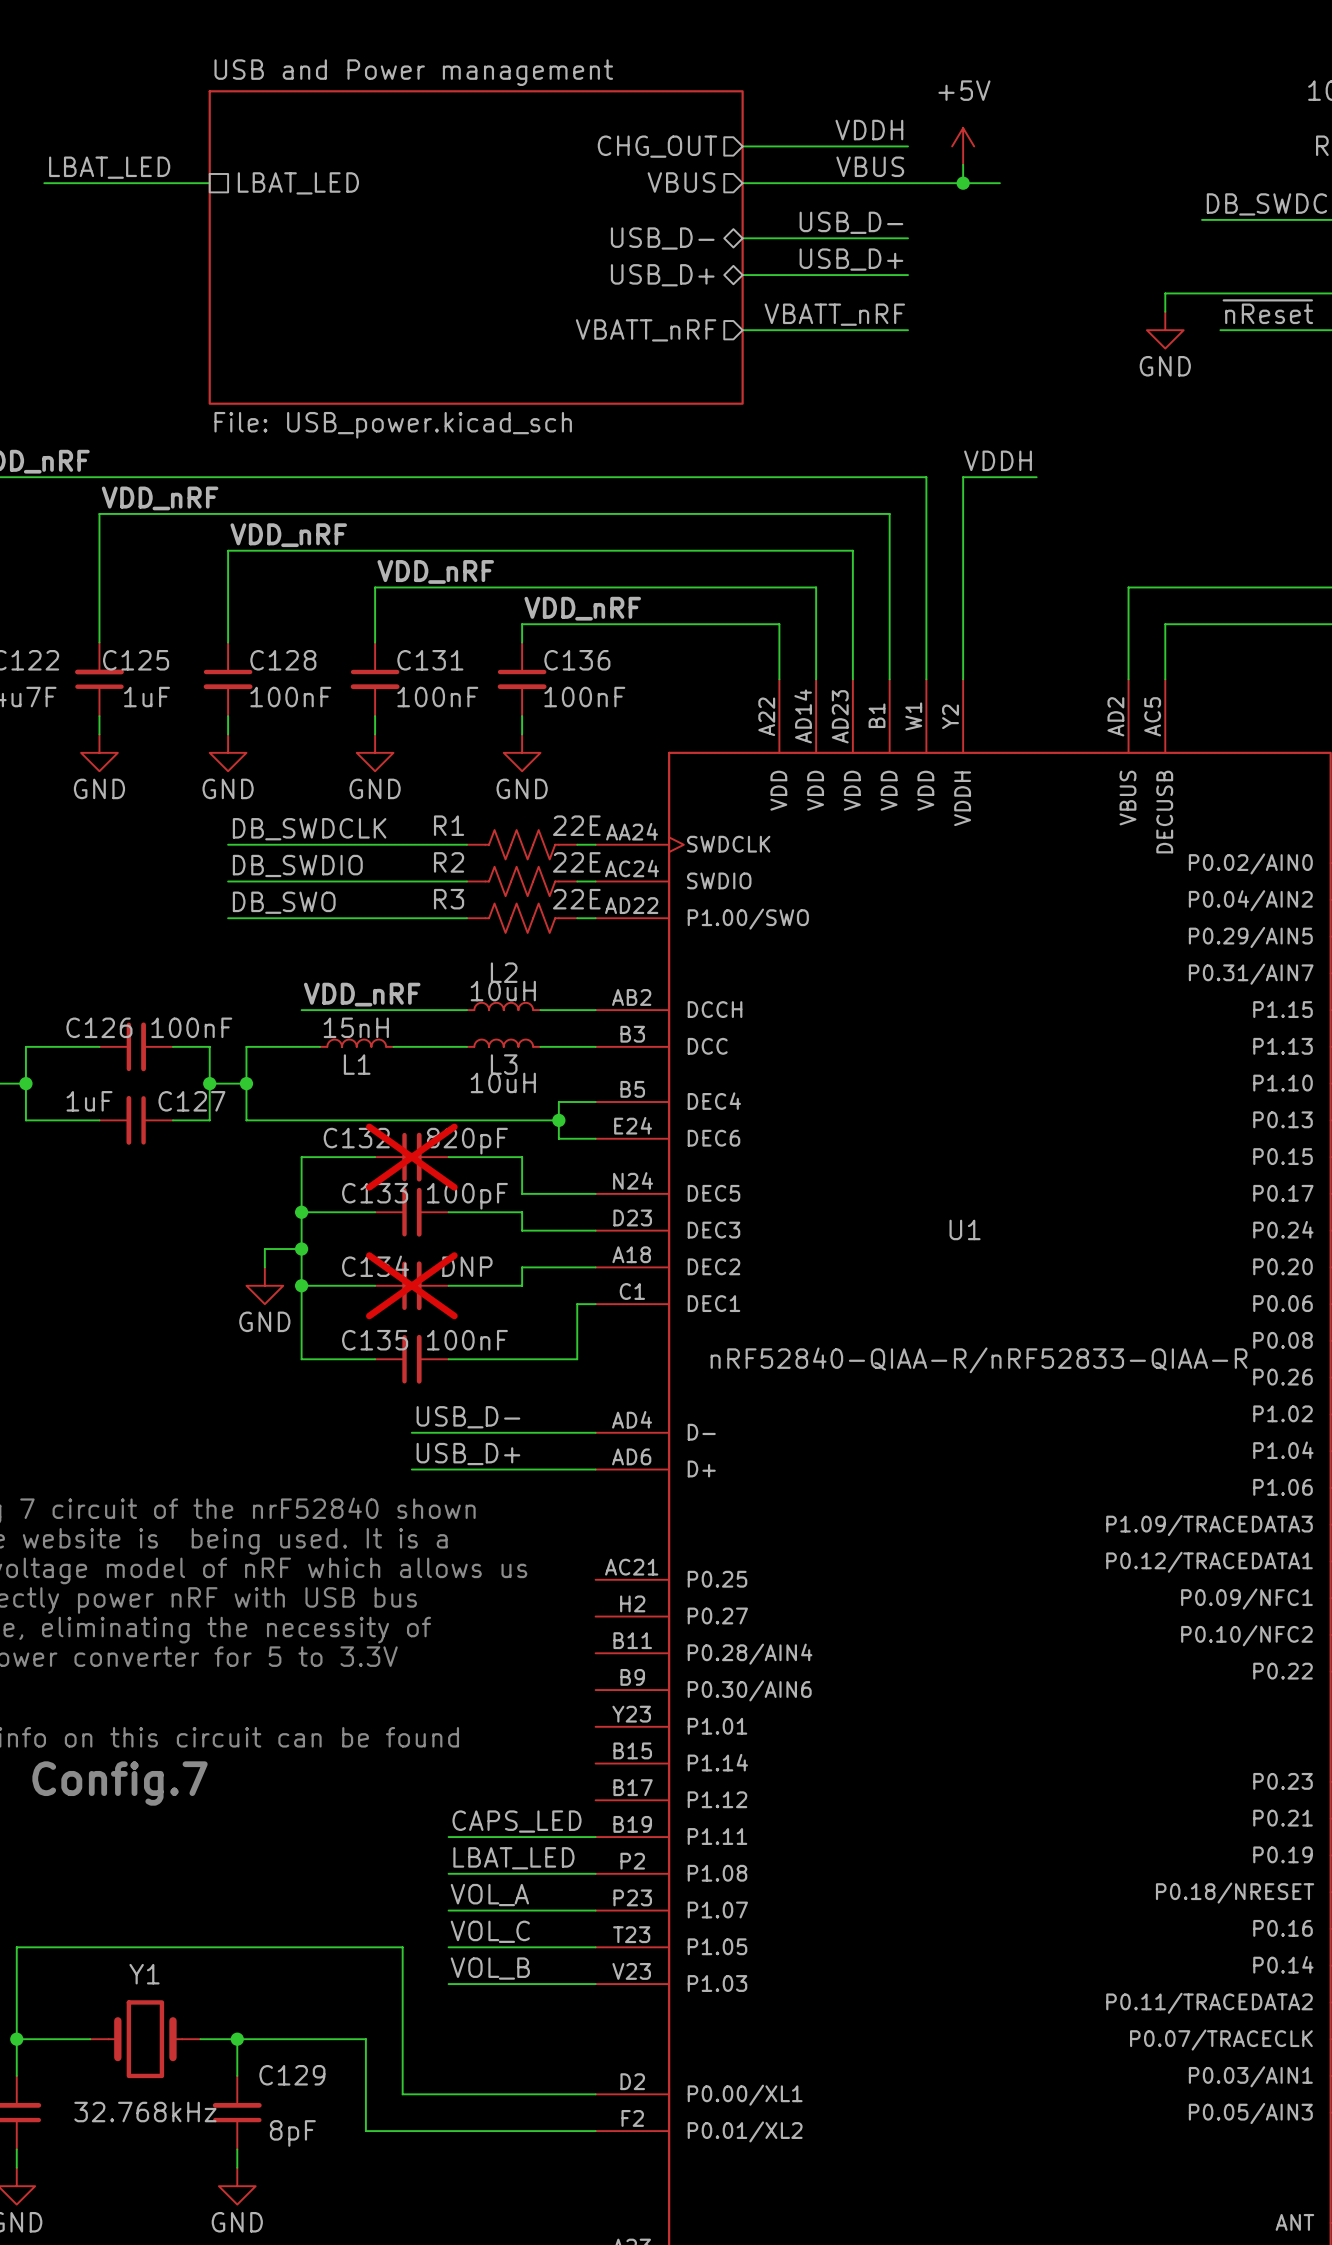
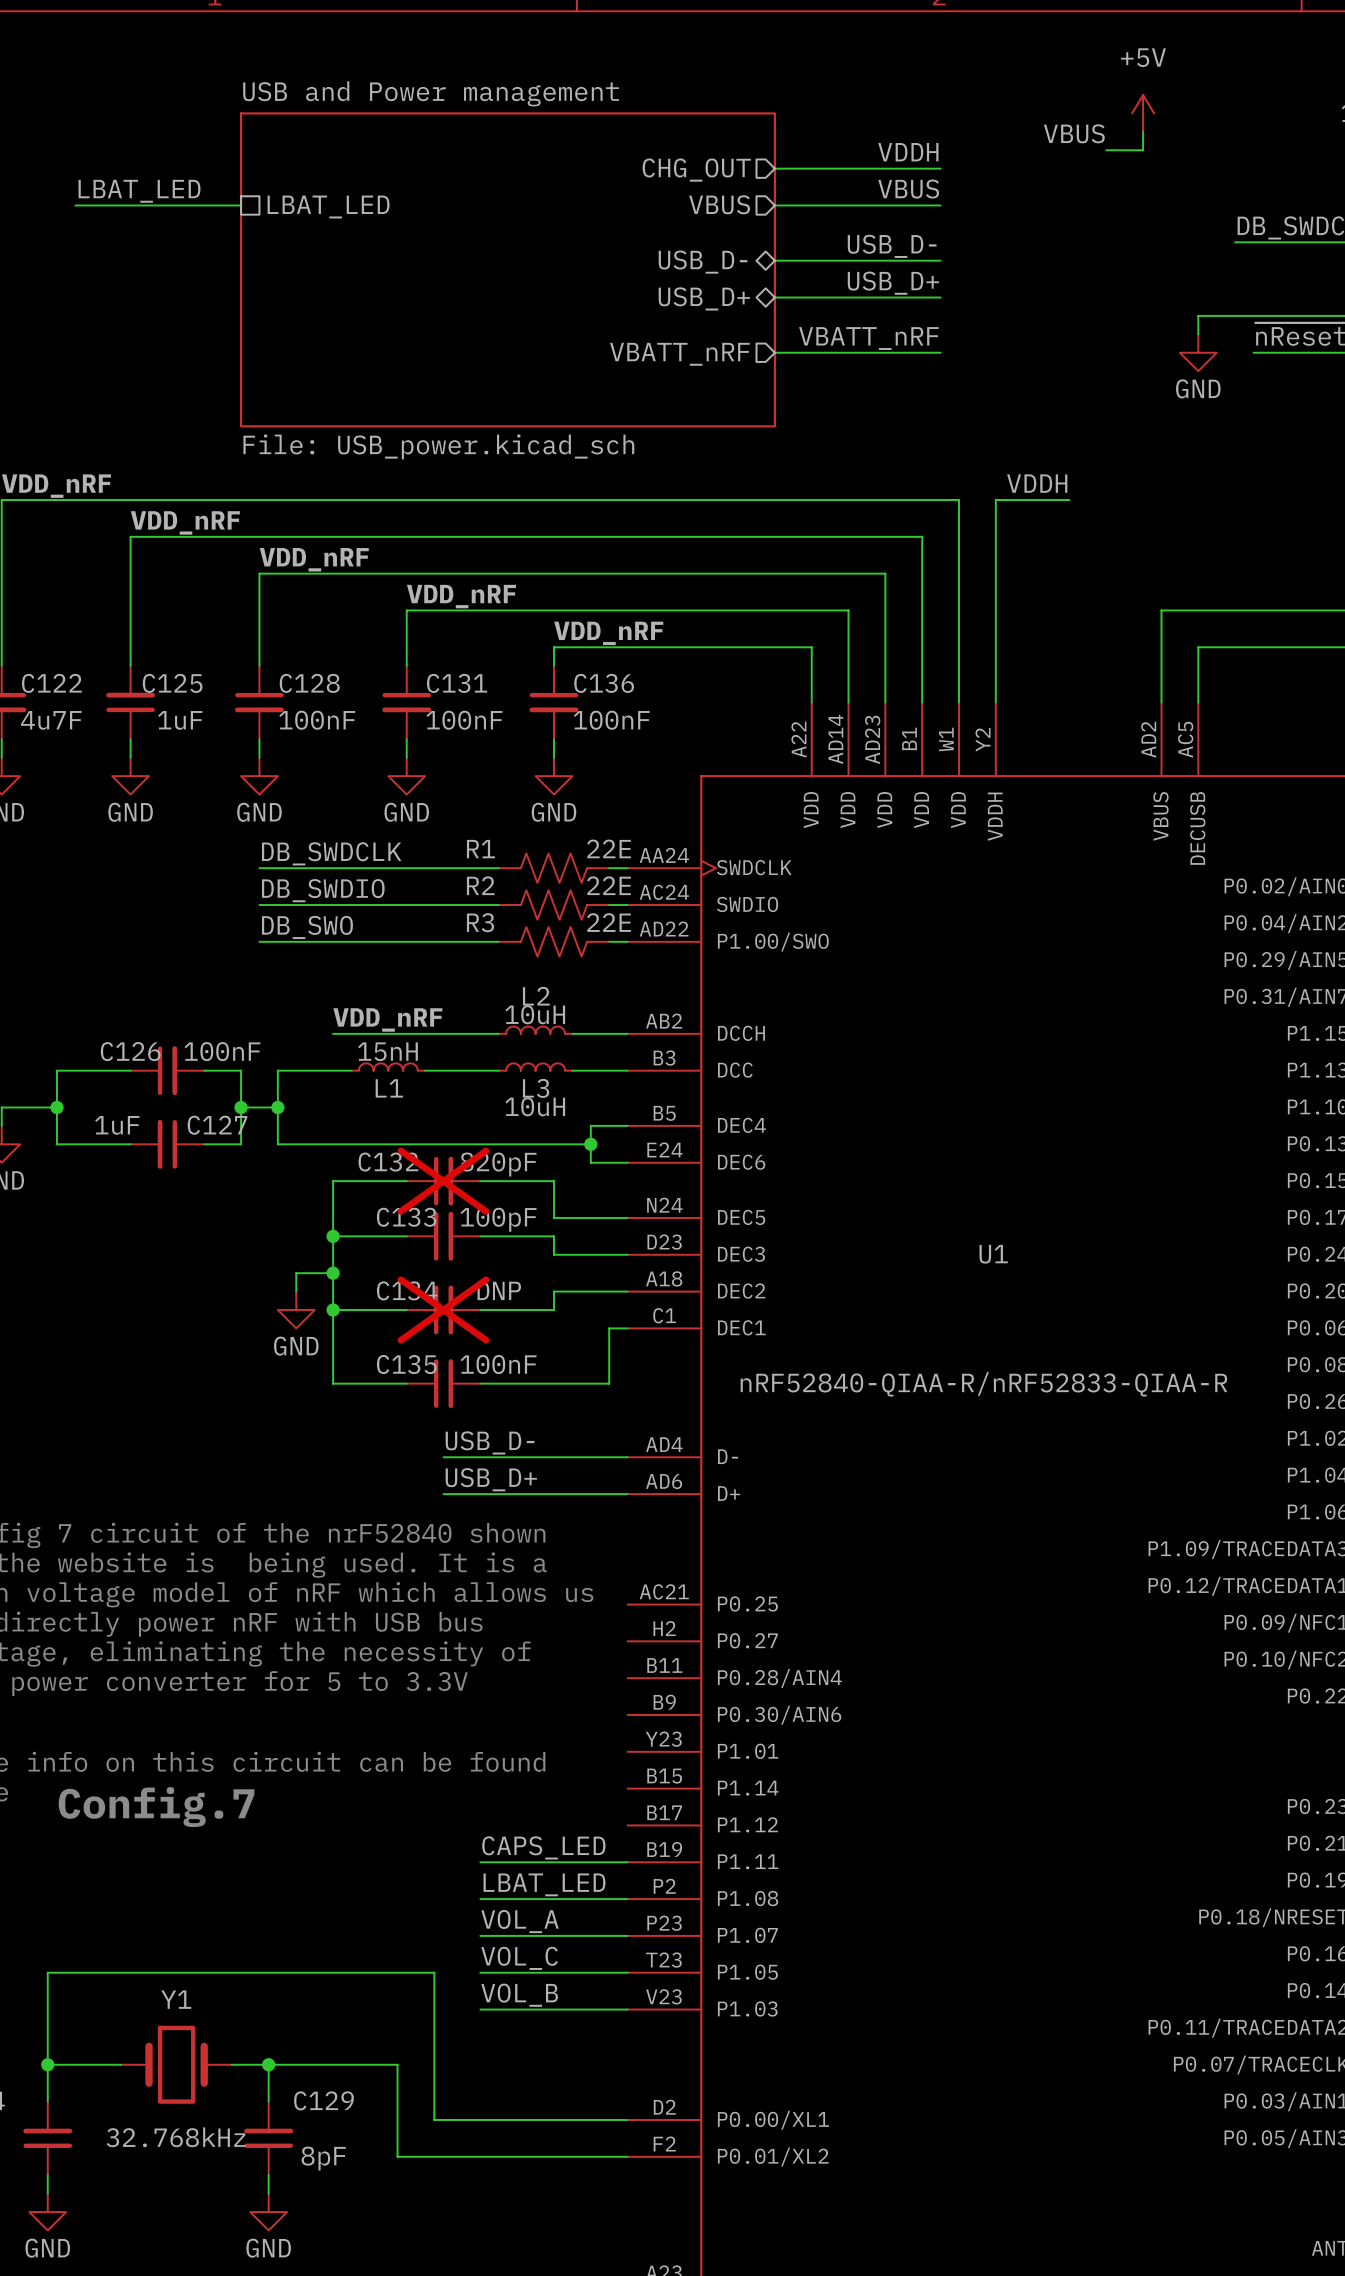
wire: none -> (1143, 131) (1143, 150) (1106, 150)
label: none -> VBUS (1074, 133)
power symbol position: +5V (963, 146) -> +5V (1143, 113)
wire: (963, 164) (963, 183) -> none
wire: (908, 183) (999, 183) -> none
junction: (963, 183) -> none

